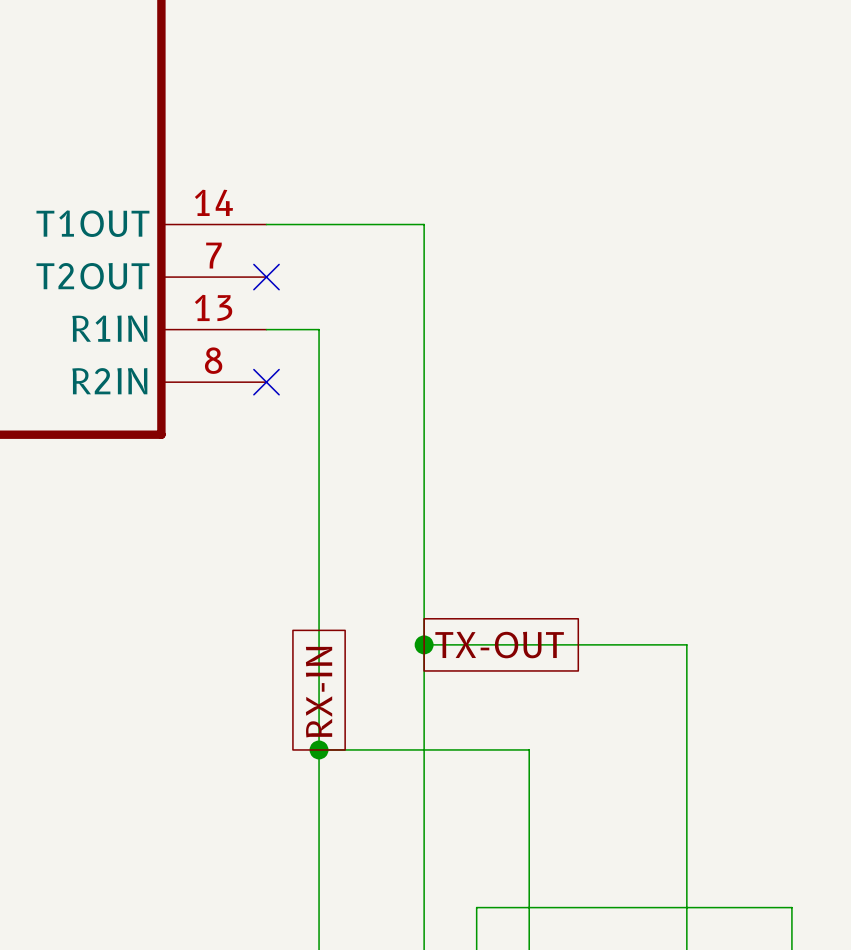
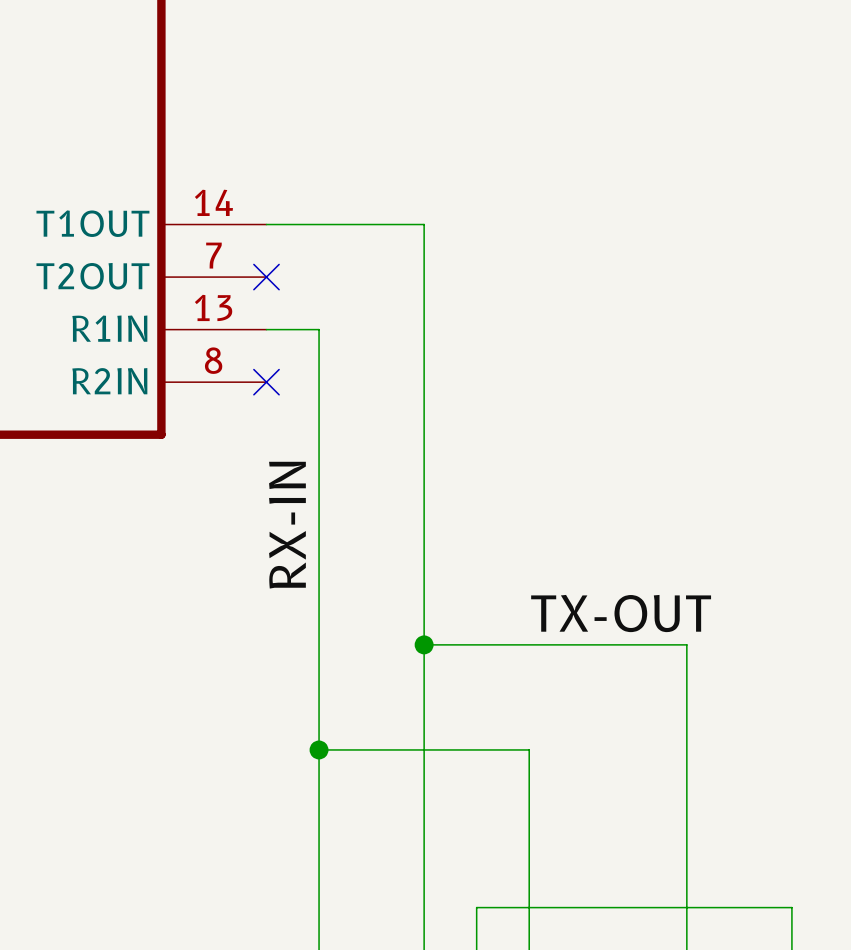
label: none -> RX-IN (287, 525)
label: none -> TX-OUT (621, 613)
global label: TX-OUT (499, 645) -> none
global label: RX-IN (319, 692) -> none

